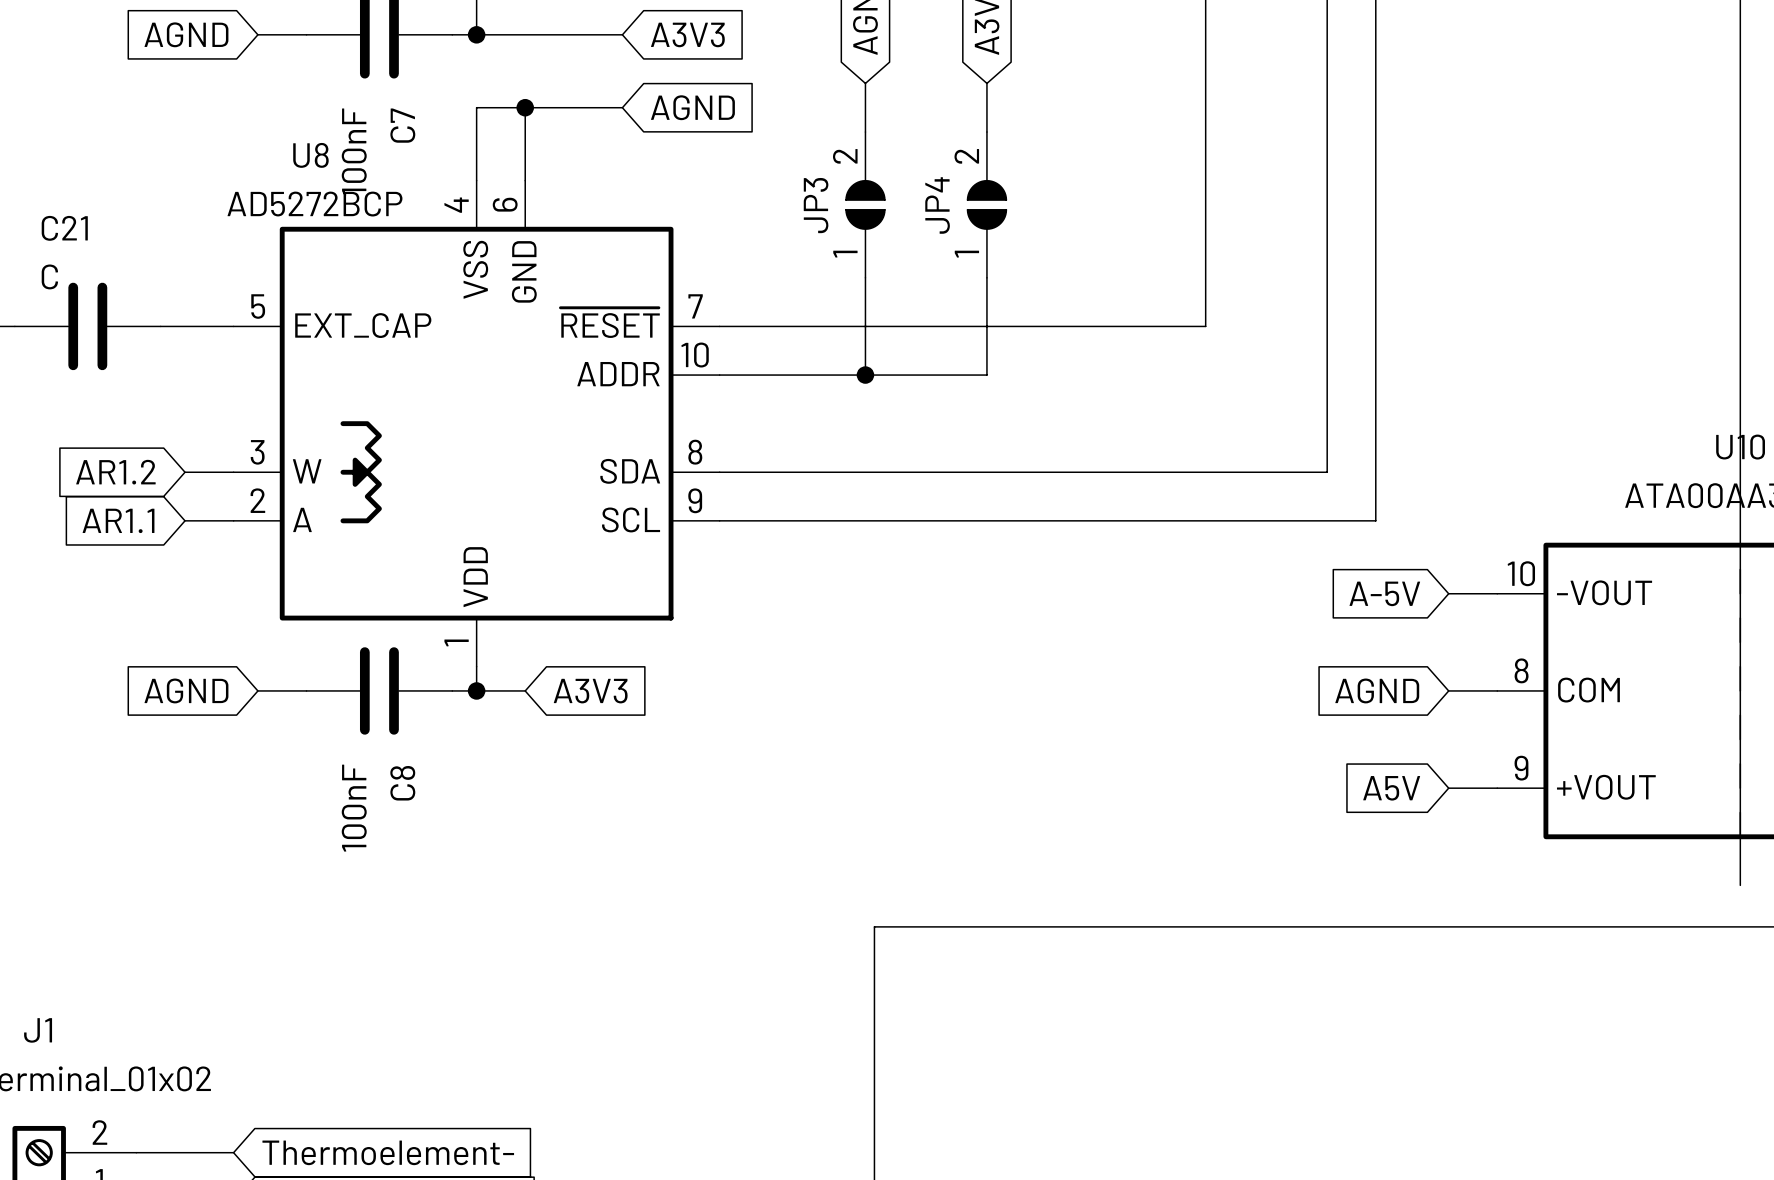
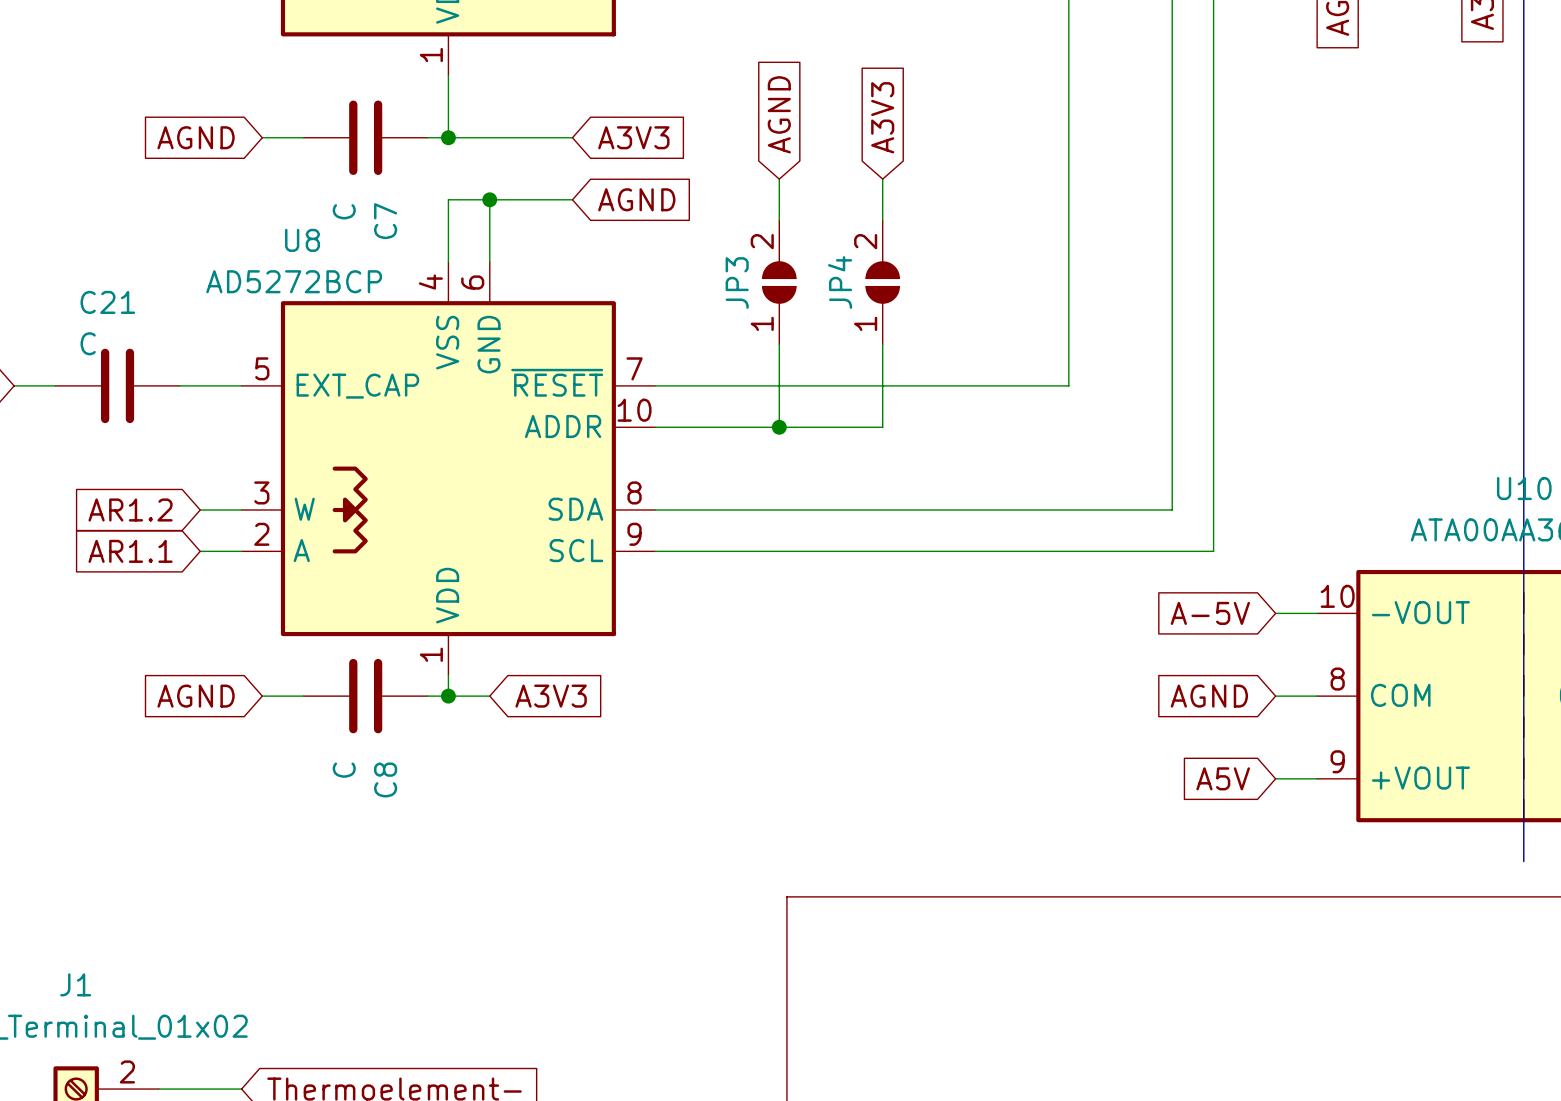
C7 value: 100nF (354, 152) -> C (344, 211)
C8 value: 100nF (354, 808) -> C (344, 770)

